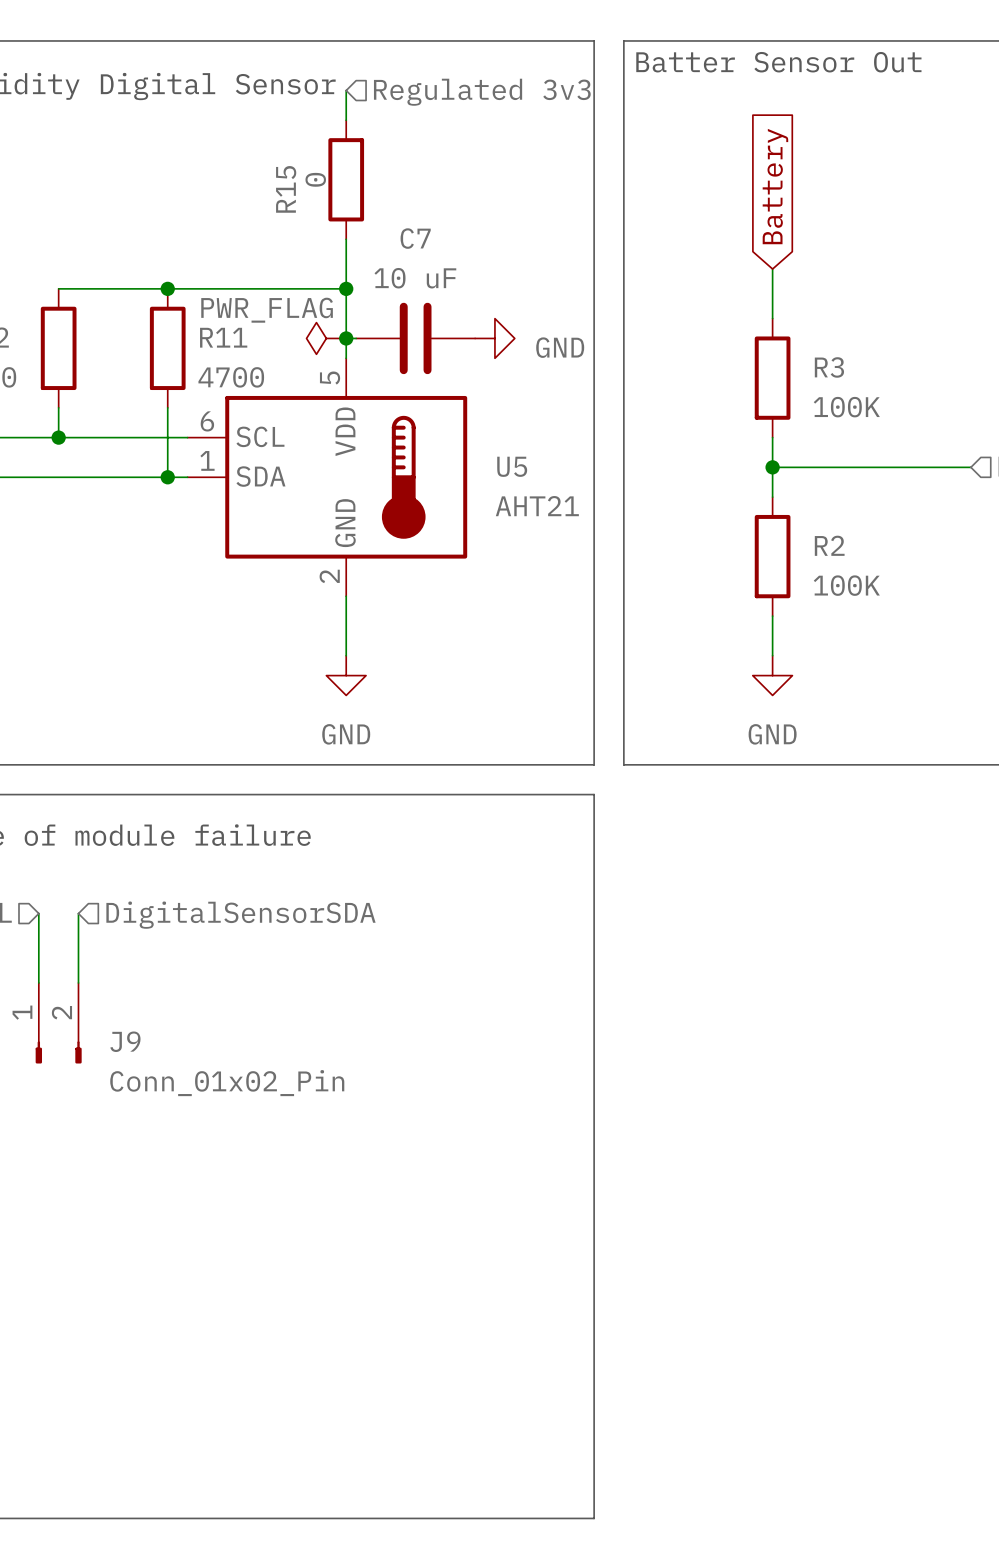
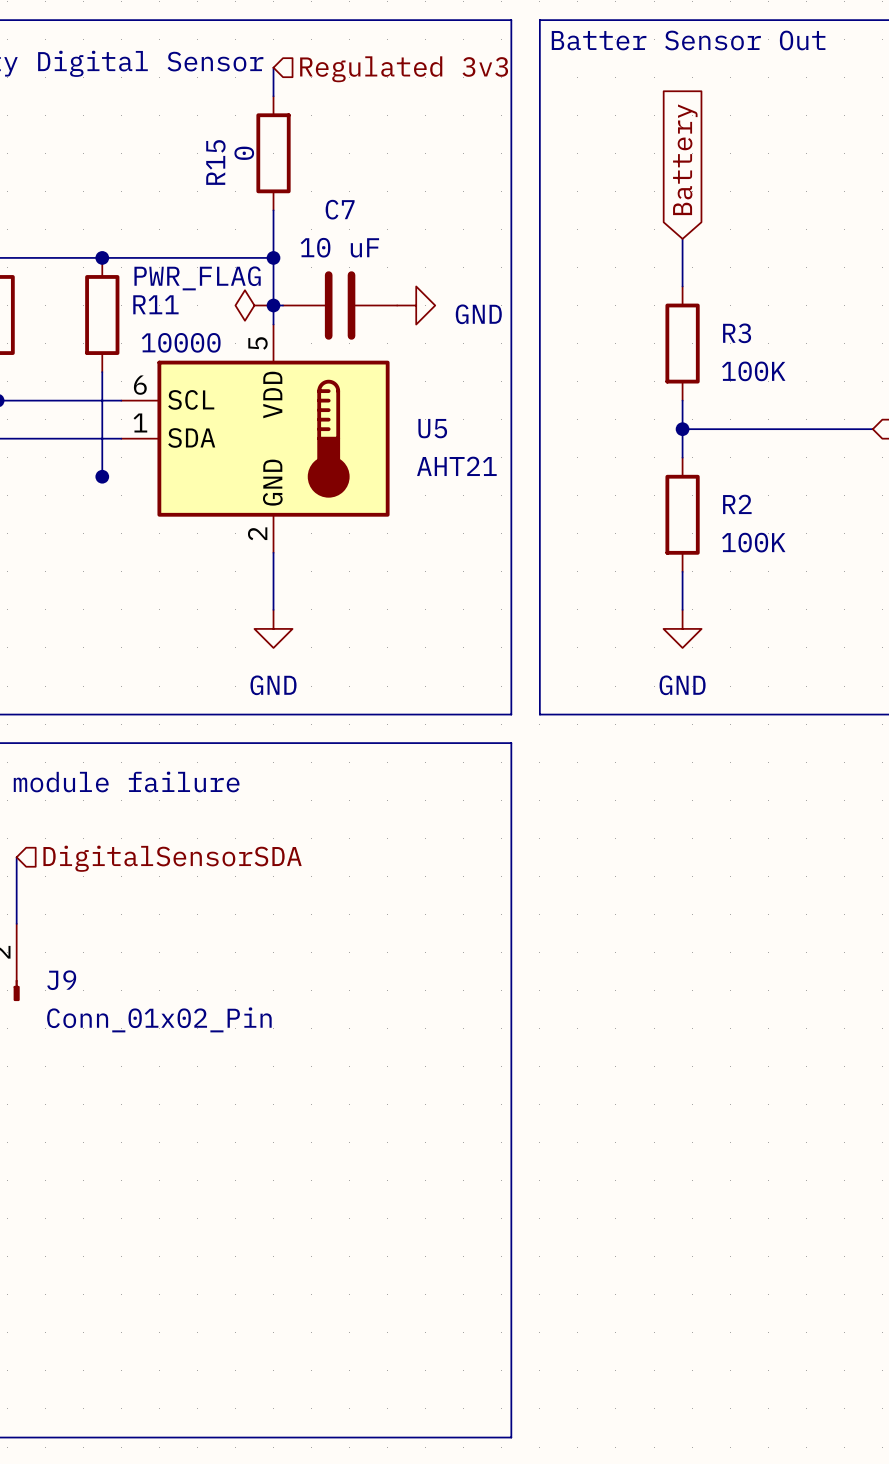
R11 value: 4700 (231, 377) -> 10000 (181, 342)
wire: none -> (102, 438) (102, 476)
junction position: (167, 477) -> (102, 476)

